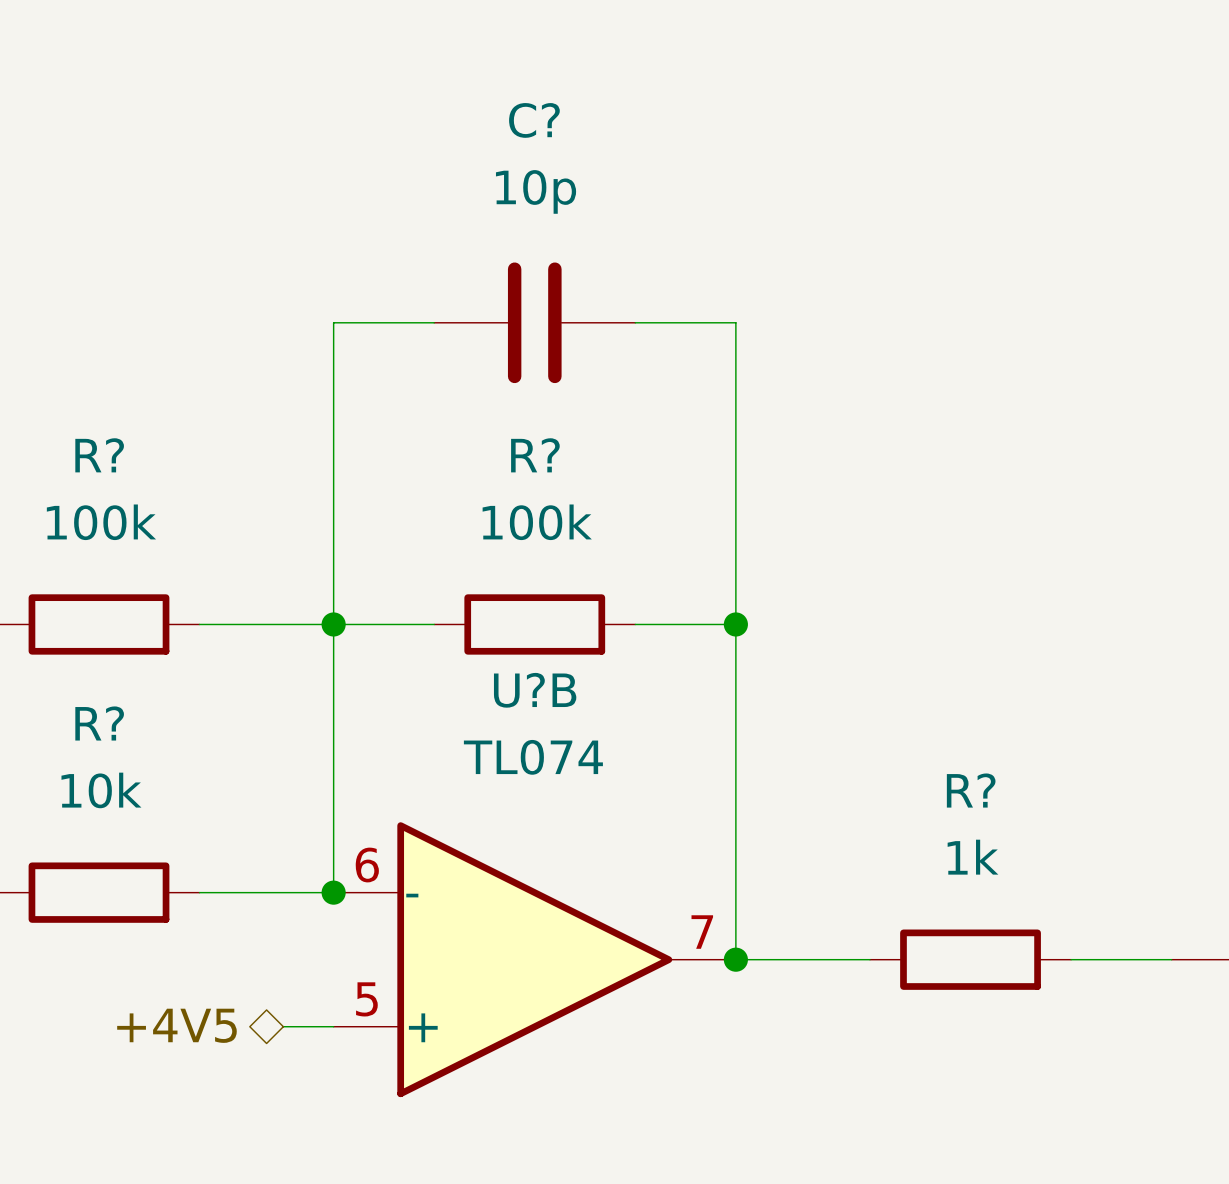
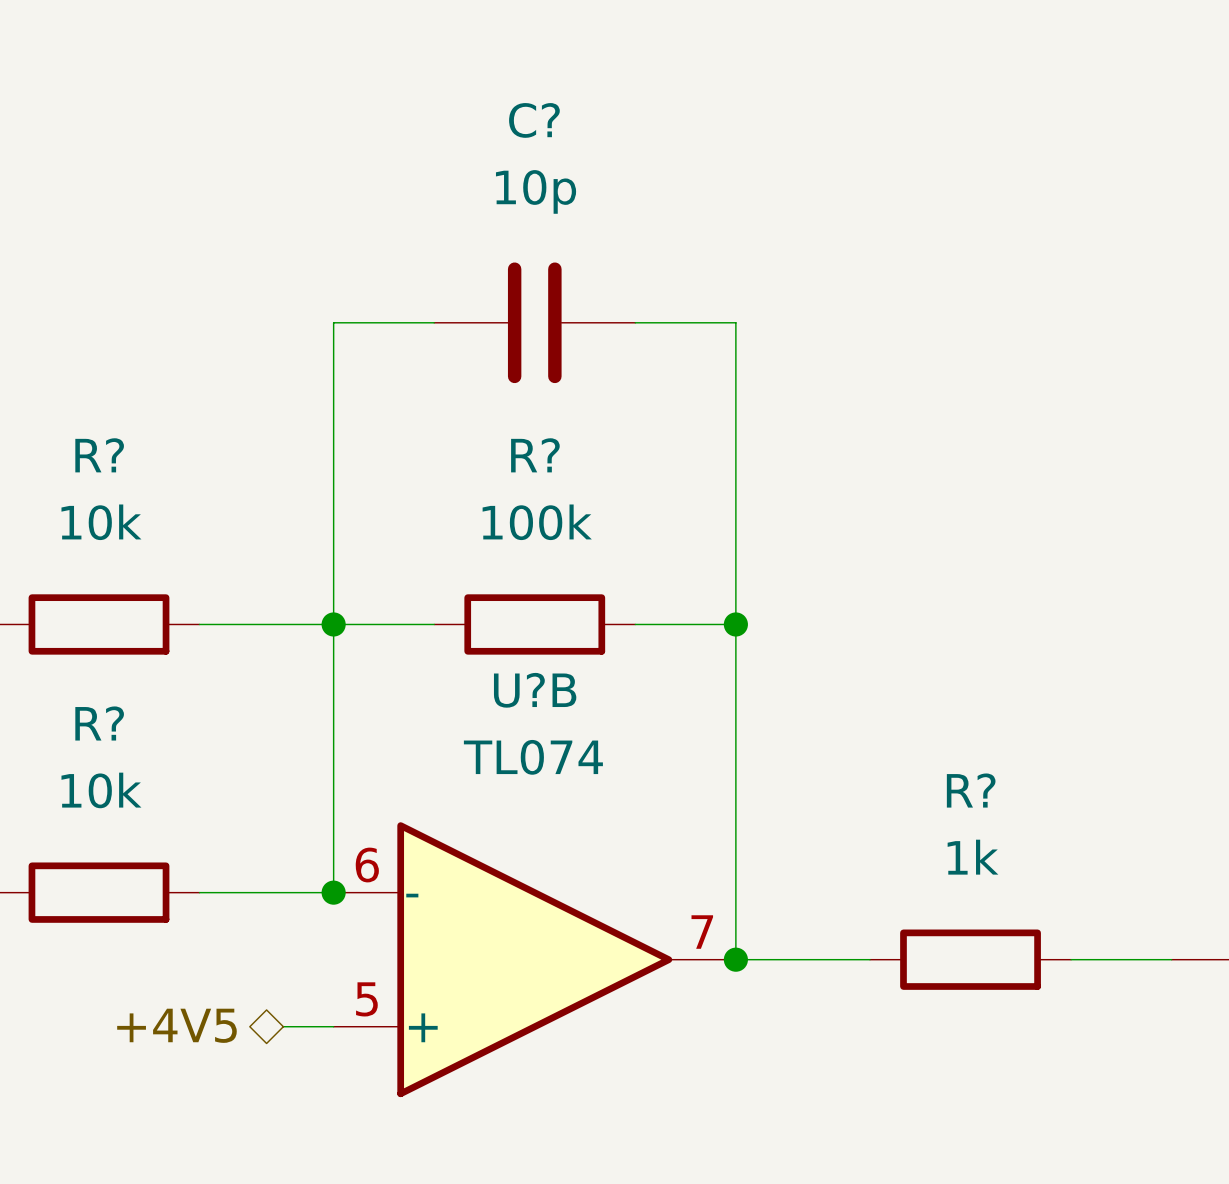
R? value: 100k (101, 522) -> 10k (101, 522)

